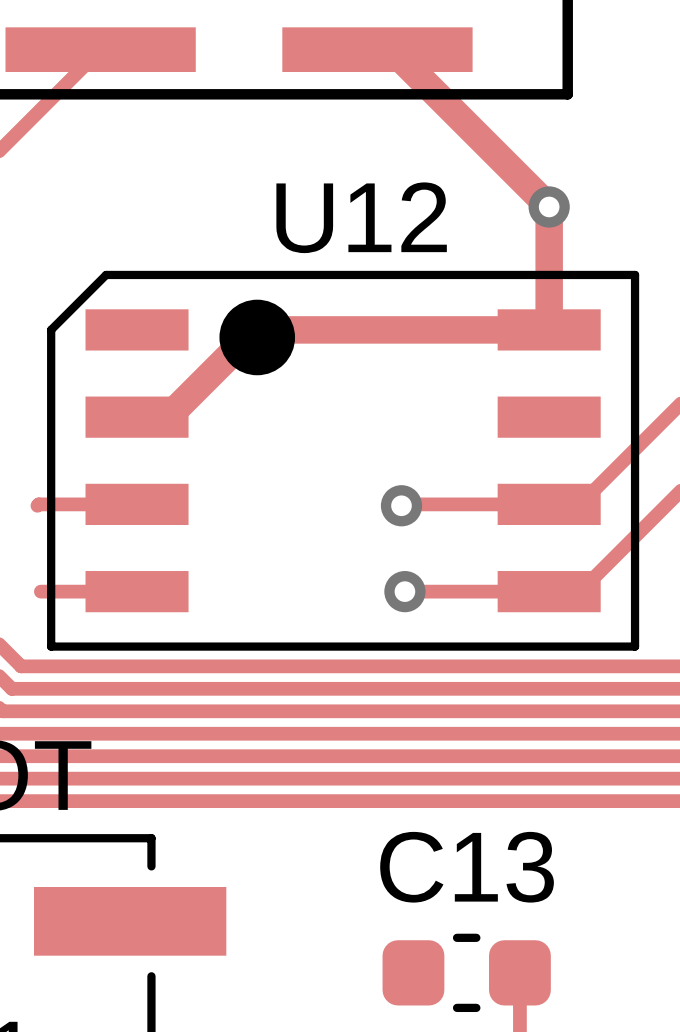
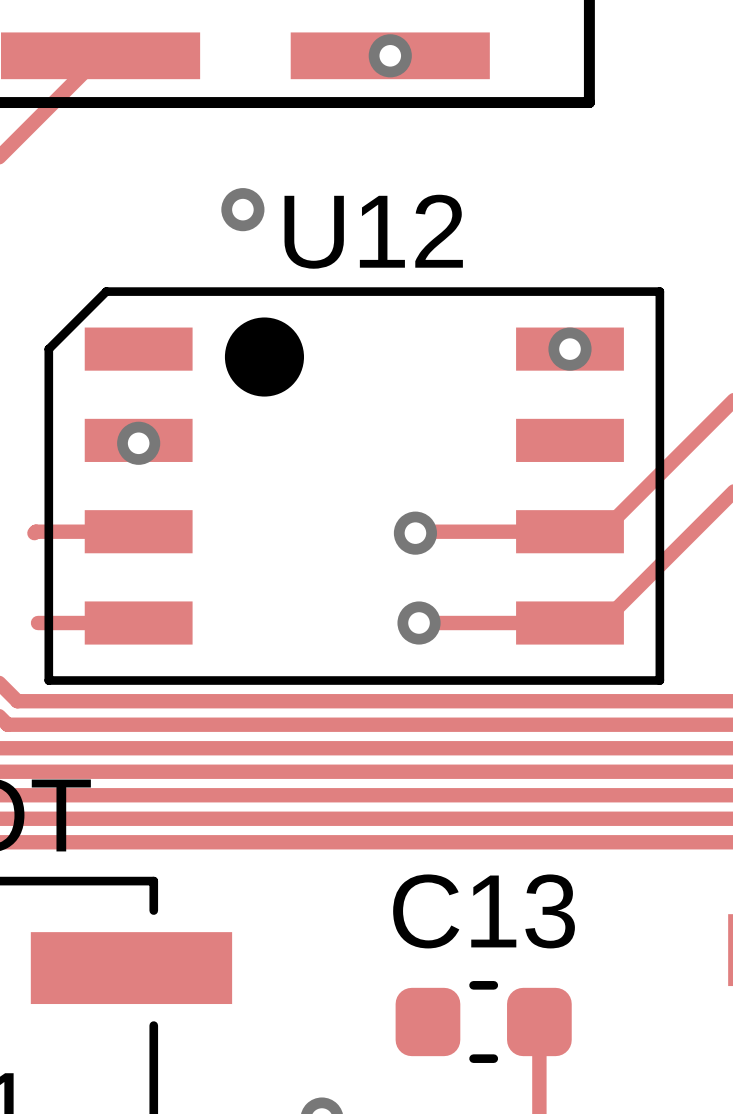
track: (377, 49) (391, 49) (549, 206) (549, 329) (255, 329) (167, 417) (137, 417) -> none
via: none -> (390, 55)
via: none -> (242, 209)
via: (549, 206) -> none
via: none -> (569, 349)
via: none -> (138, 443)

